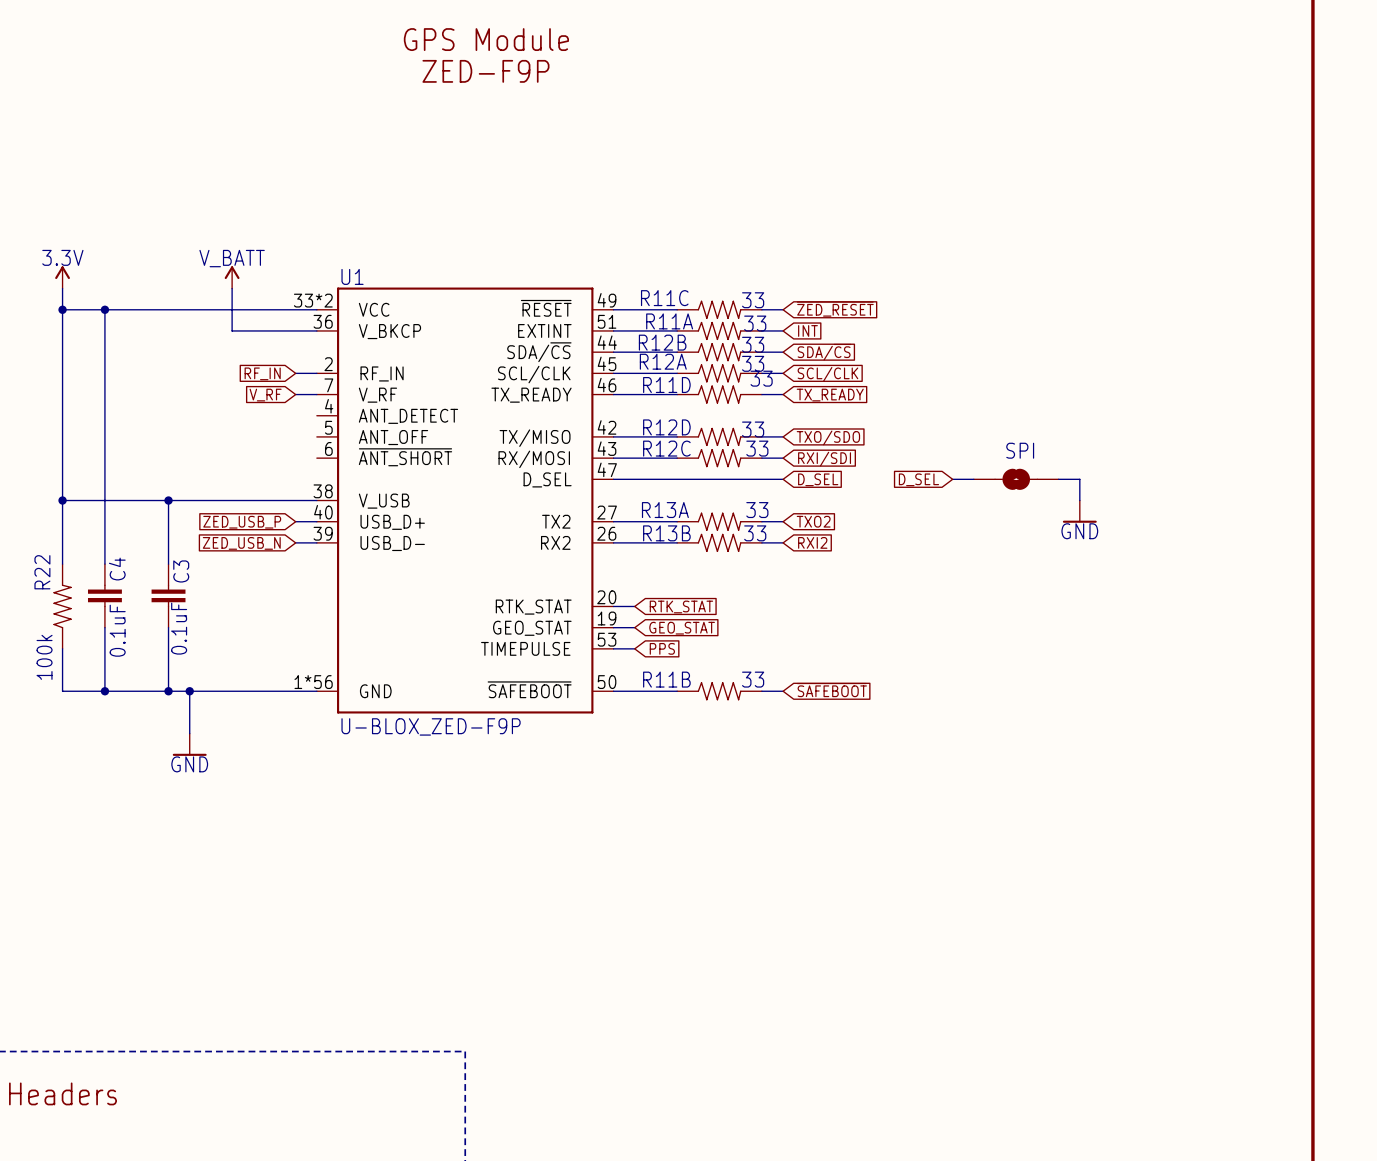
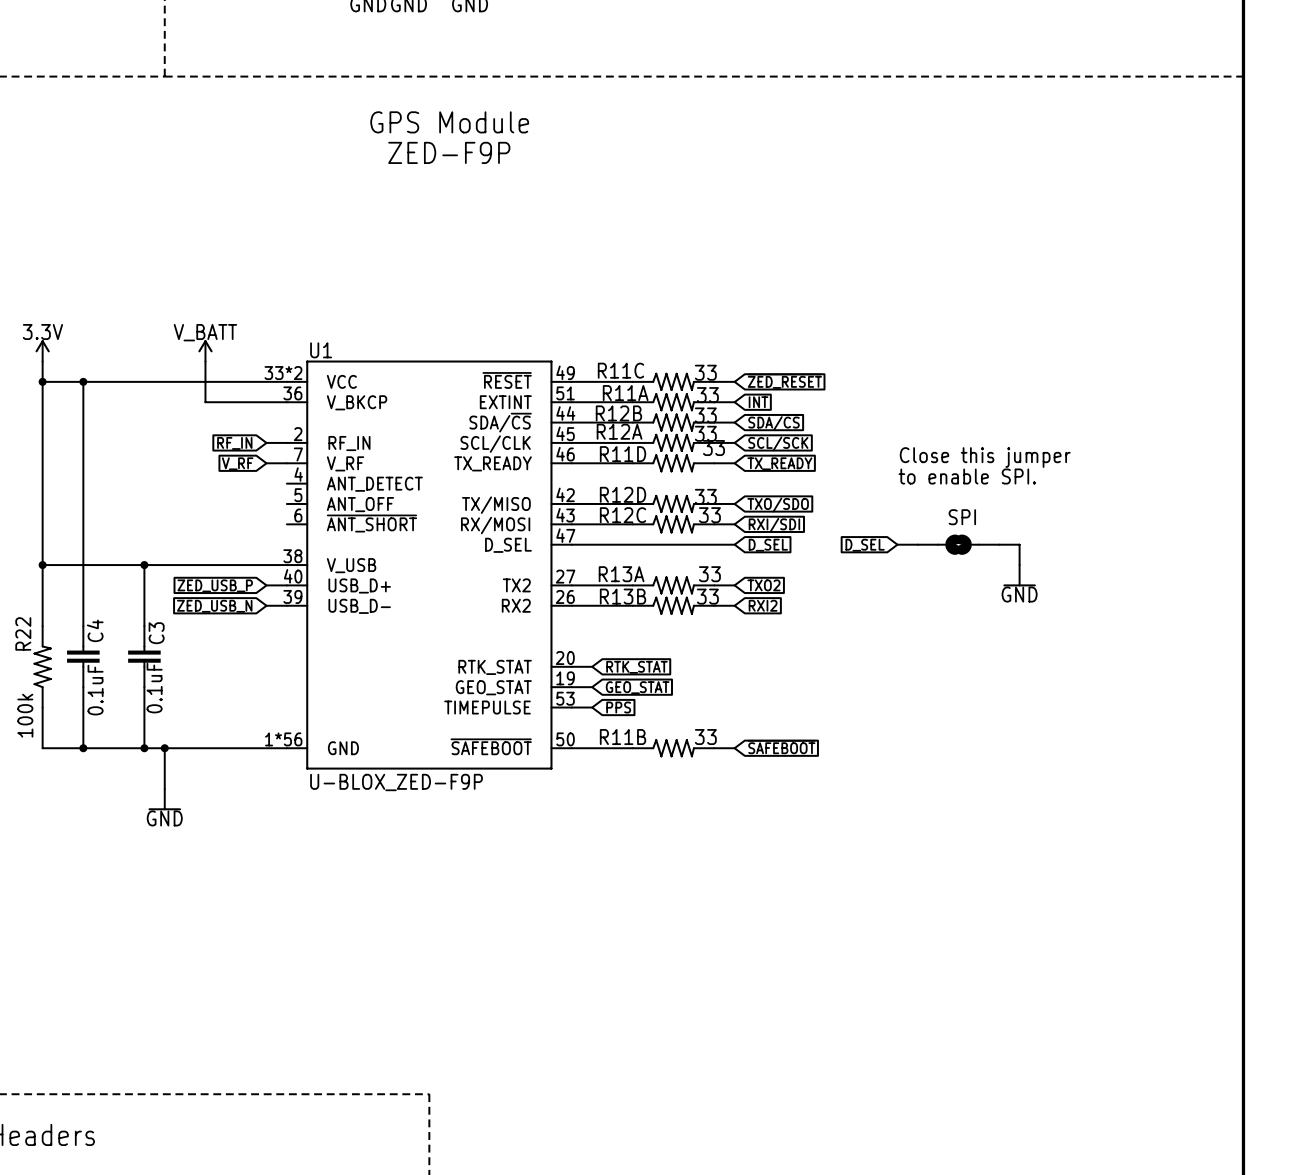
global label: SCL/CLK (827, 374) -> SCL/SCK (778, 443)
text: none -> Close this jumper (985, 457)
text: none -> to enable SPI. (967, 476)

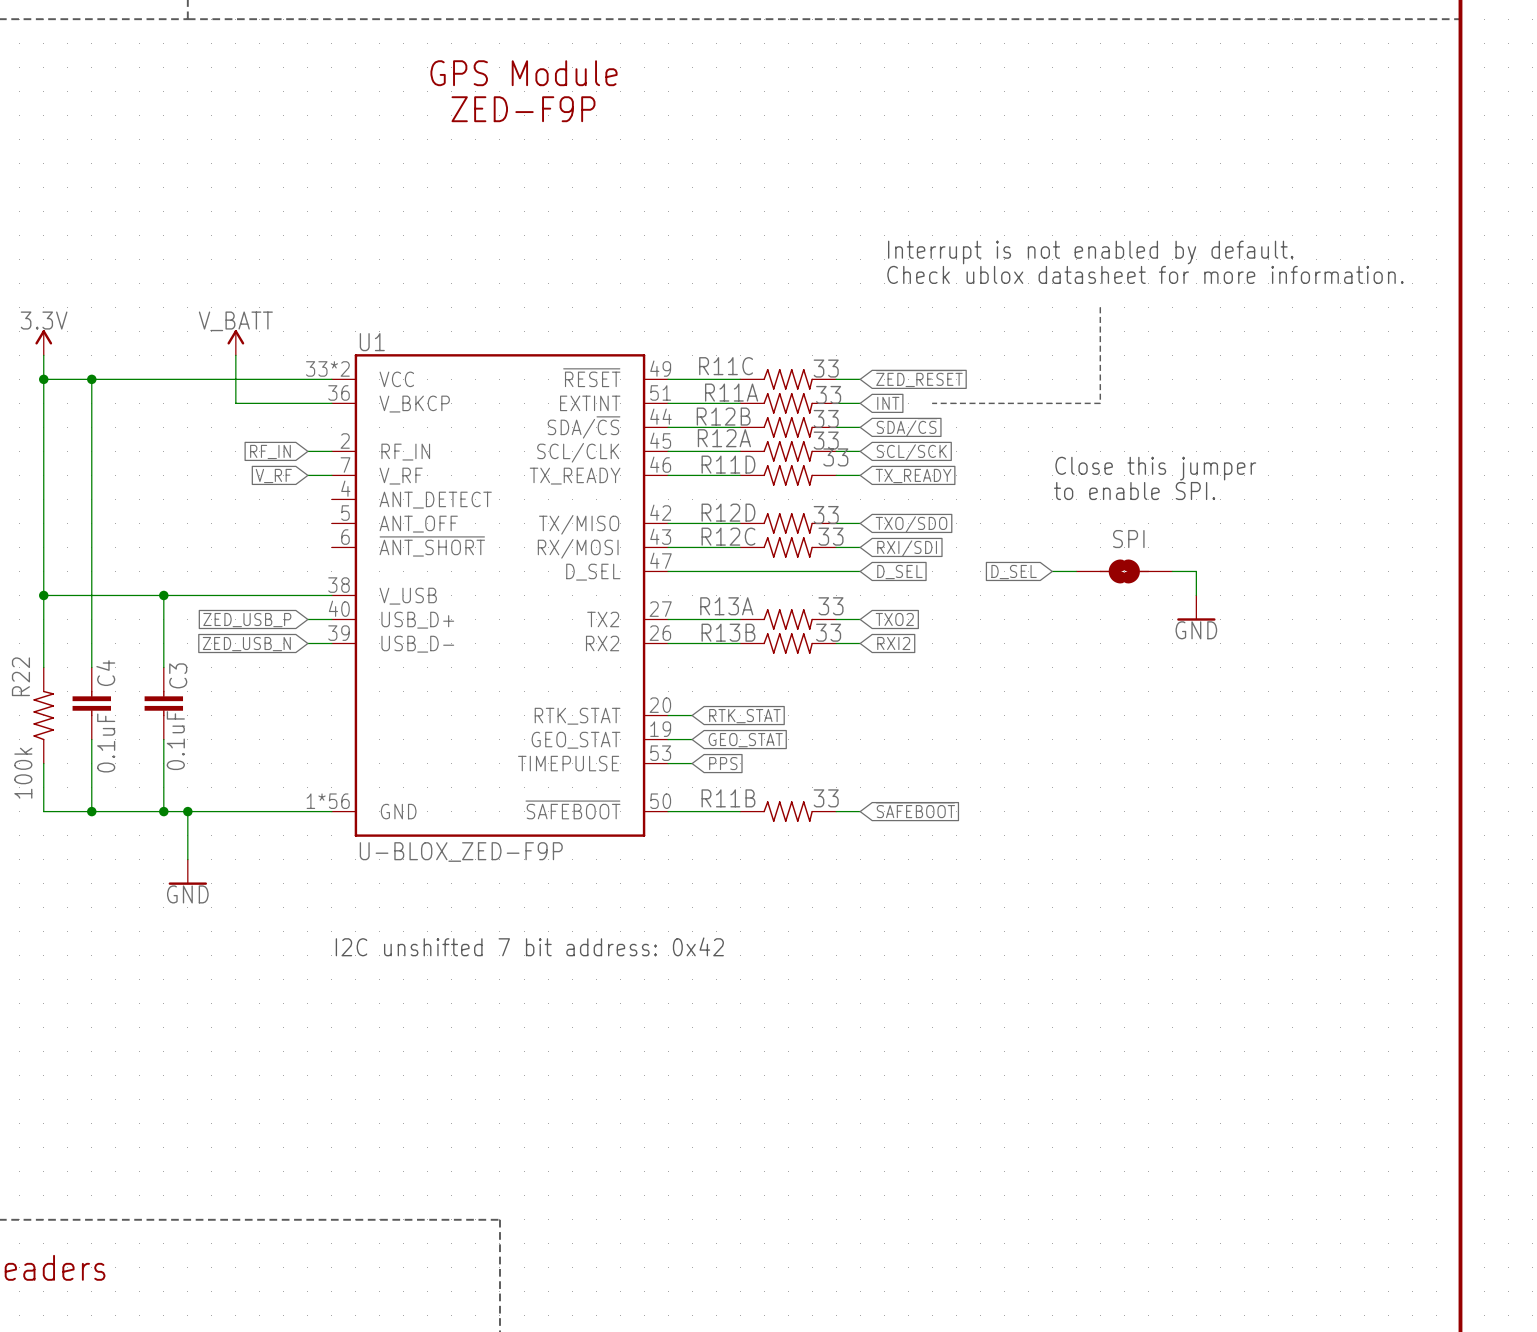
text: none -> Interrupt is not enabled by default. (1090, 252)
text: none -> Check ublox datasheet for more information. (1145, 274)
line: none -> (1100, 307) (1100, 403) (932, 403)
text: none -> I2C unshifted 7 bit address: 0x42 (529, 946)

